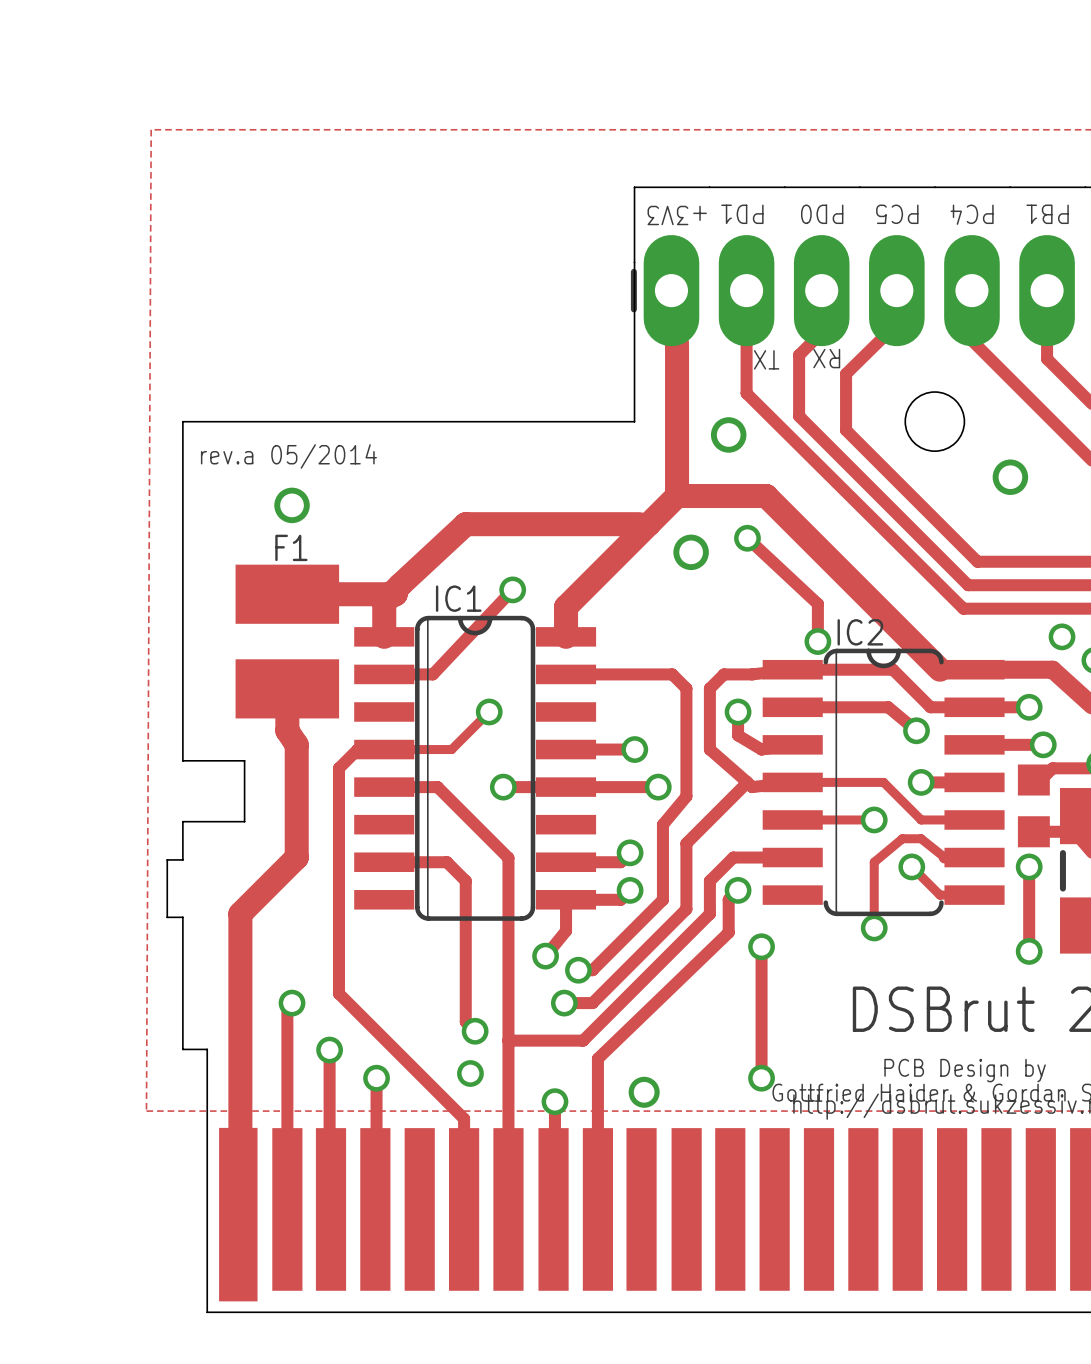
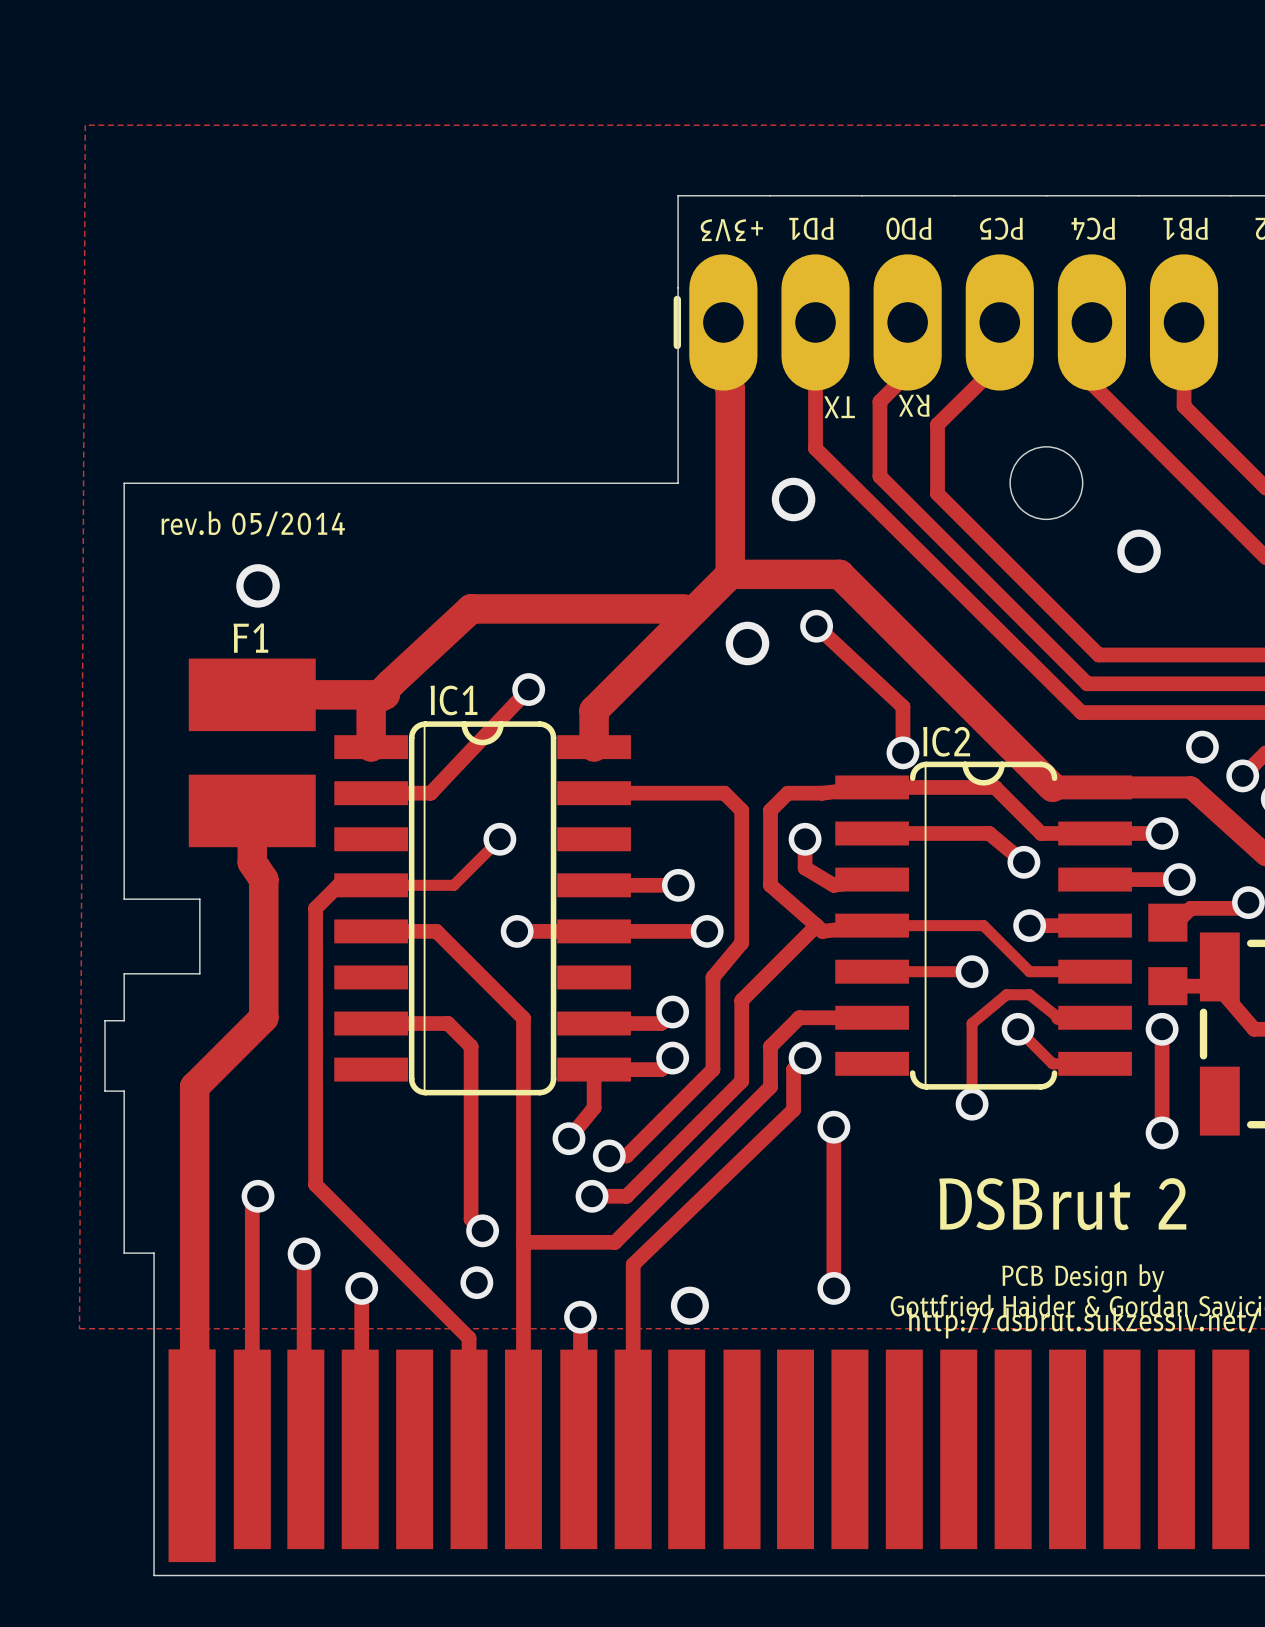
text: rev.a 05/2014 (288, 456) -> rev.b 05/2014 (253, 523)

